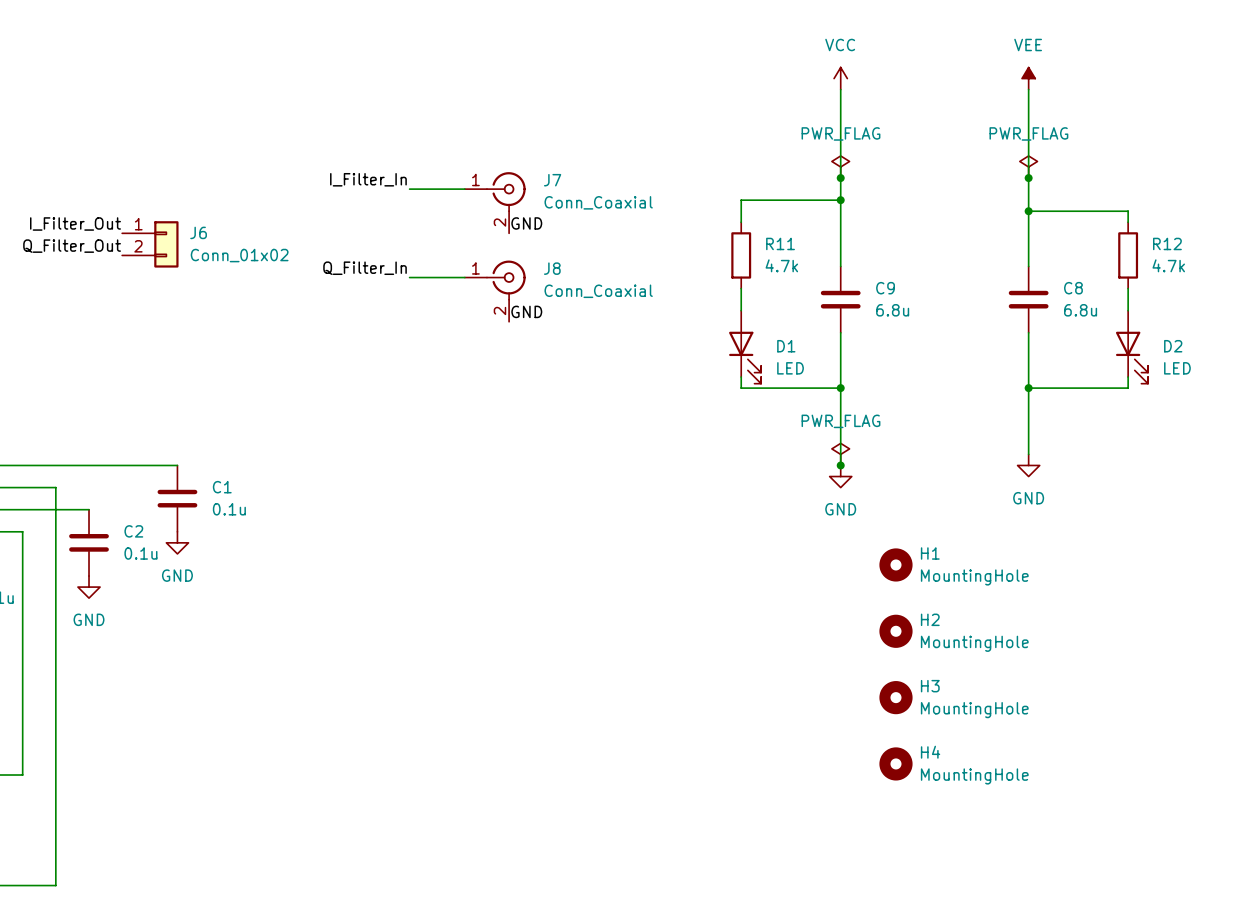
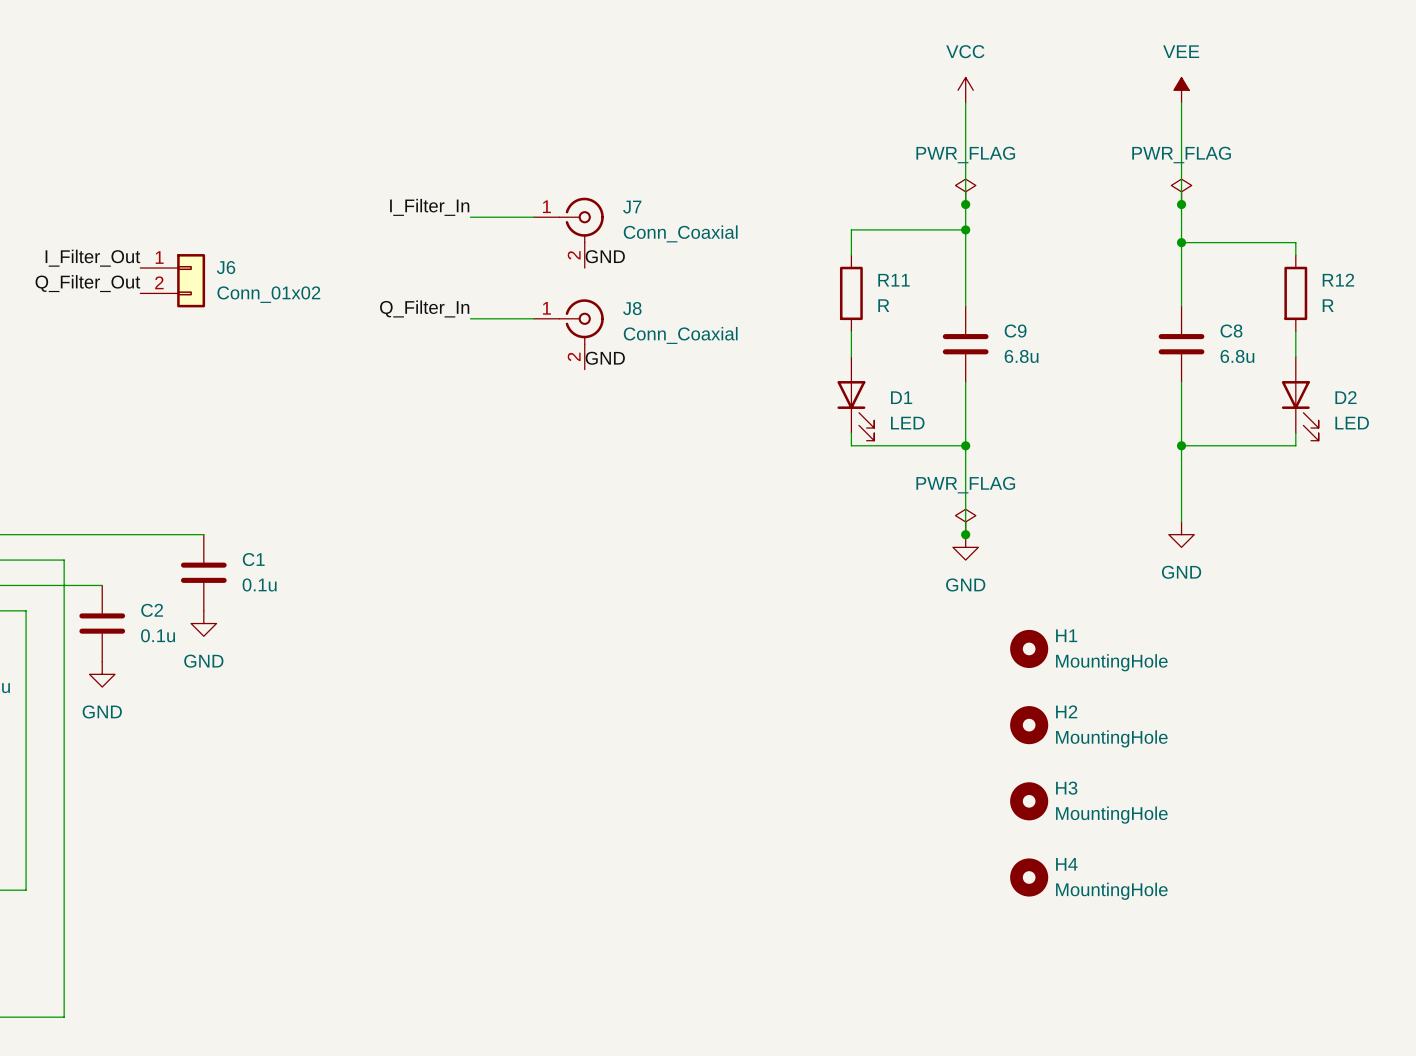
R11 value: 4.7k (781, 265) -> R (883, 305)
R12 value: 4.7k (1168, 265) -> R (1328, 305)

